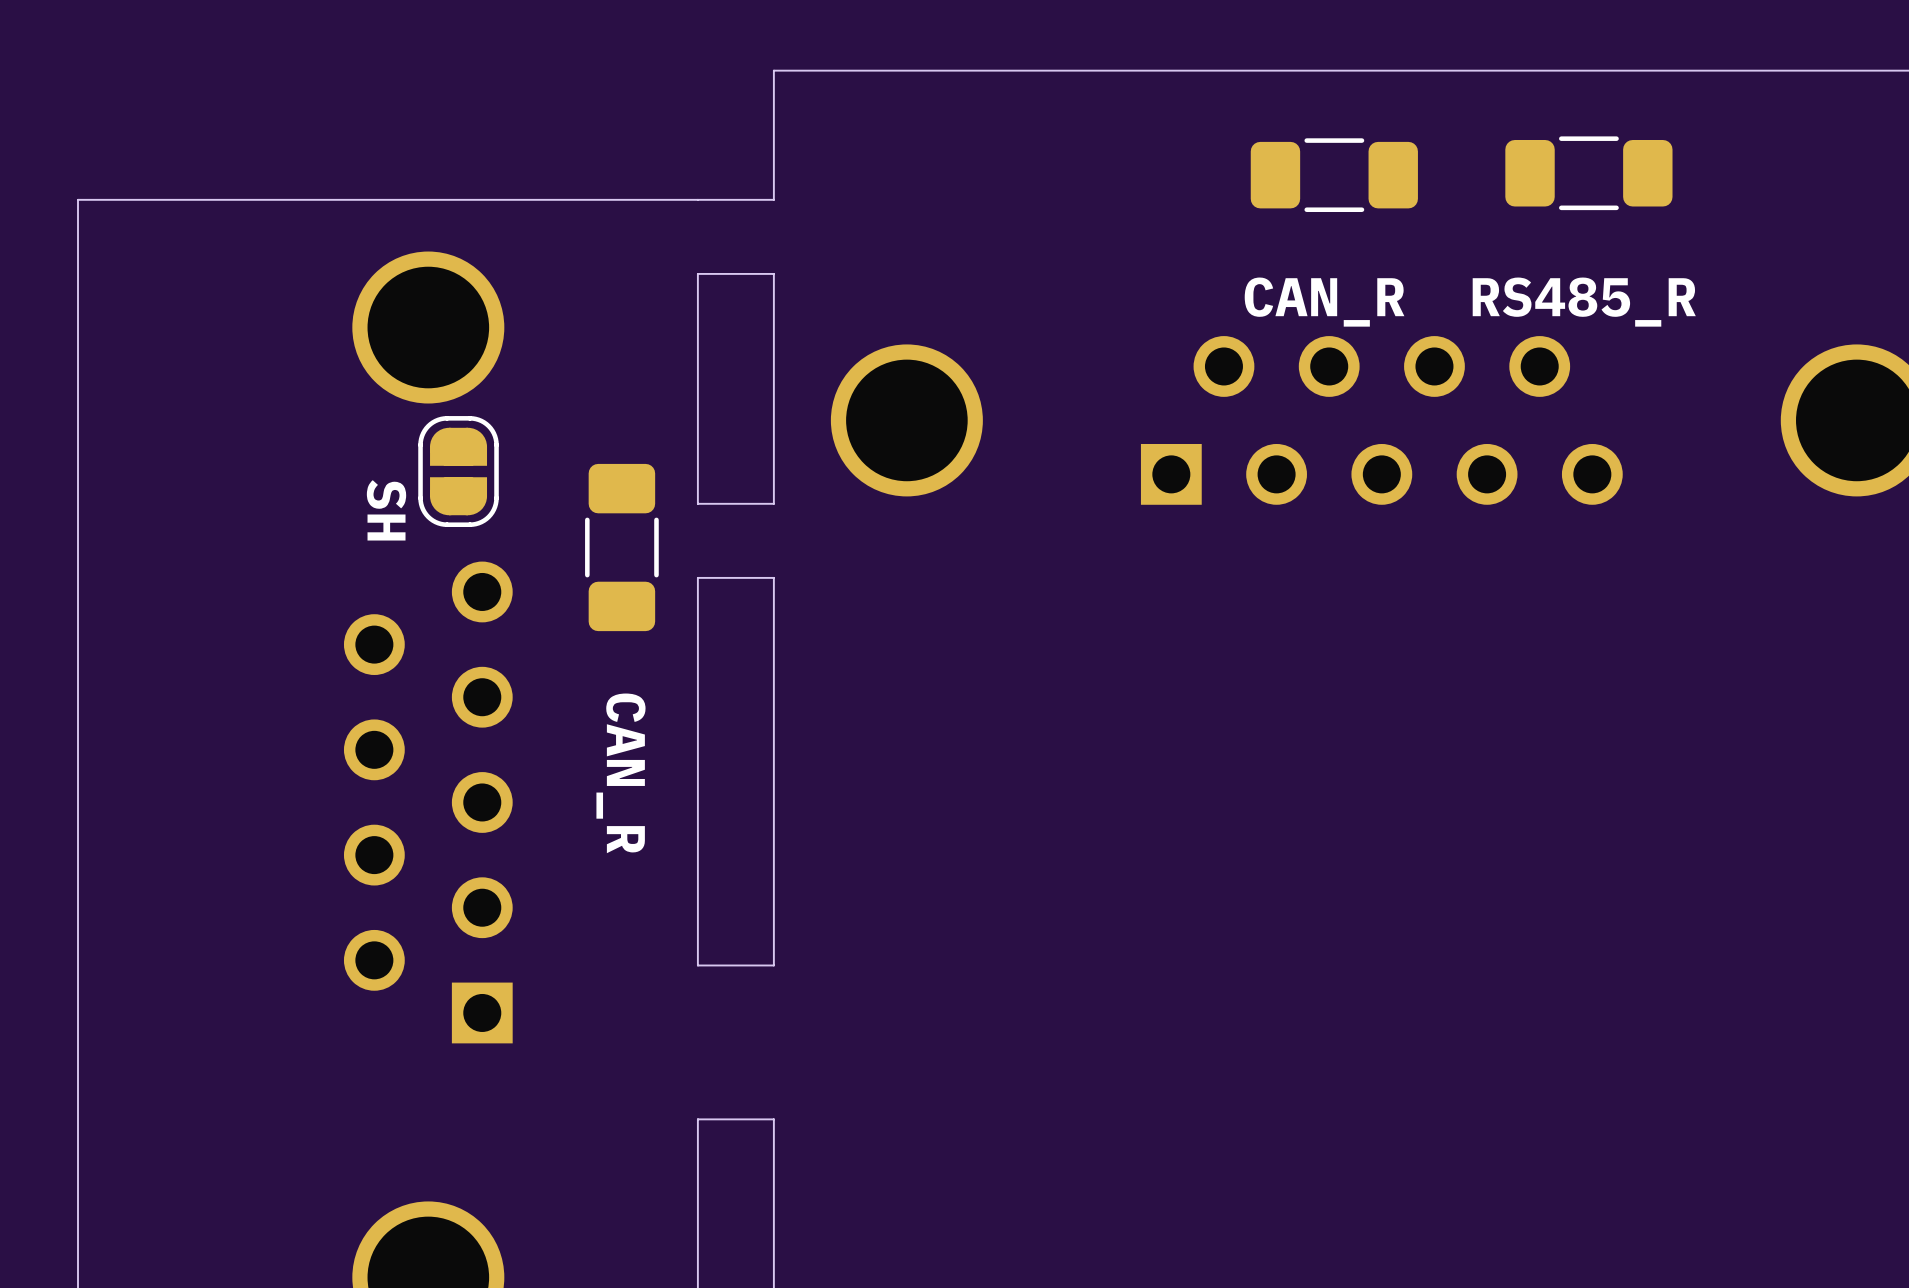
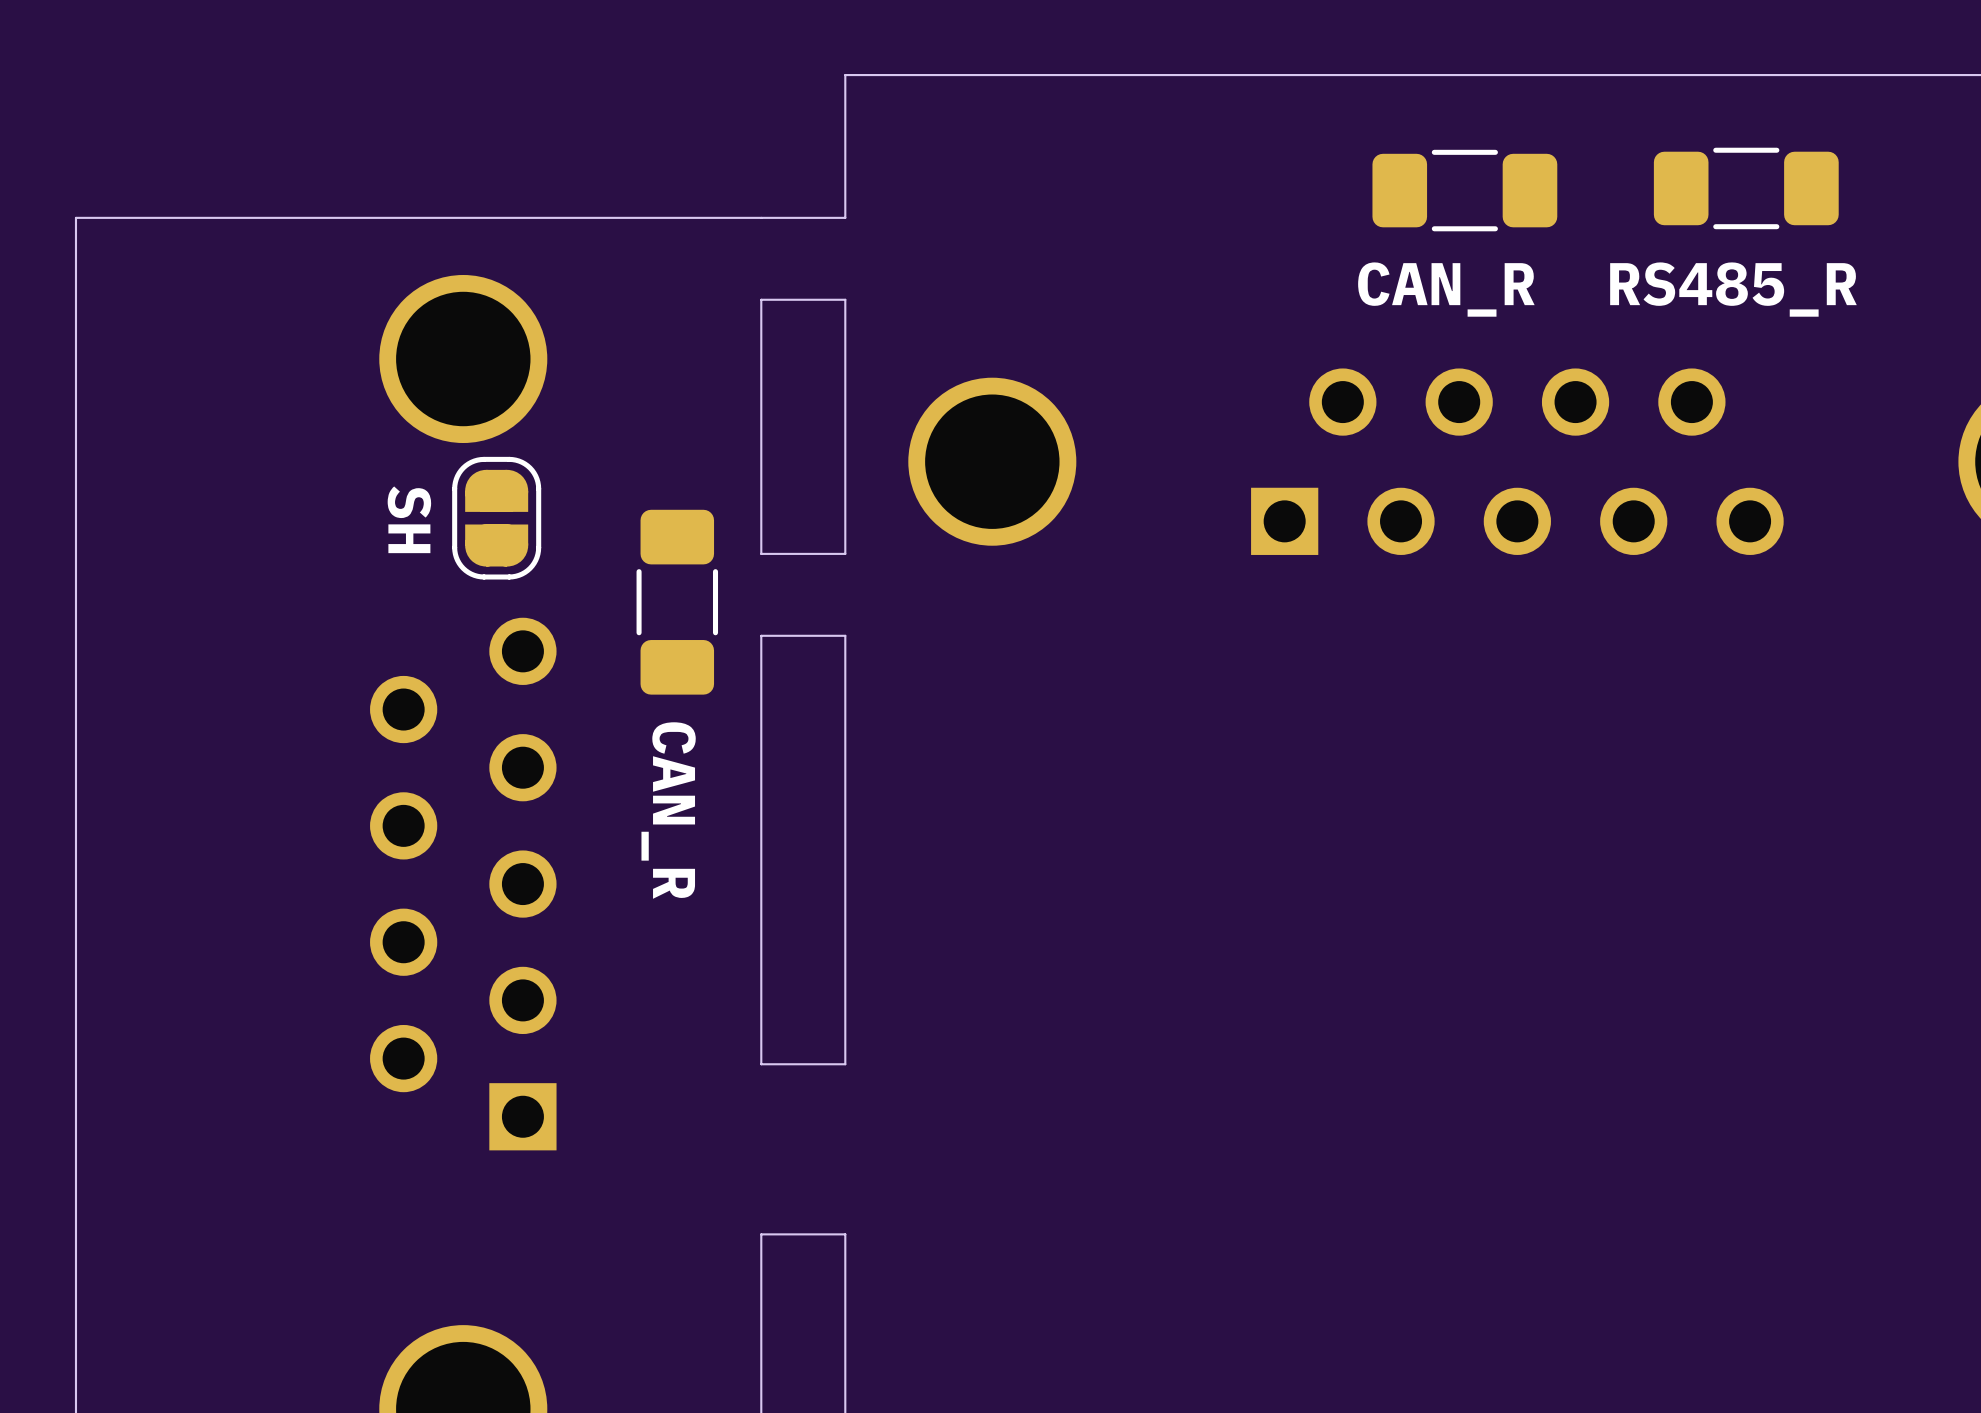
text position: CAN_R (1324, 302) -> CAN_R (1446, 289)
text position: RS485_R (1584, 302) -> RS485_R (1733, 289)
text position: SH (386, 510) -> SH (409, 519)
text position: CAN_R (620, 773) -> CAN_R (668, 810)

